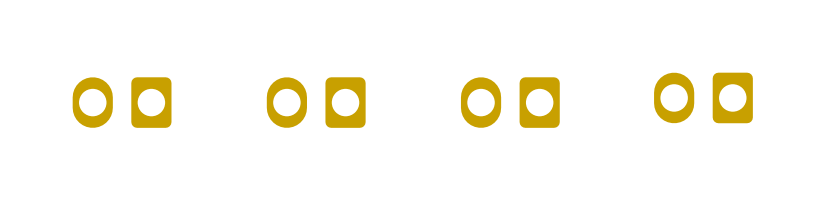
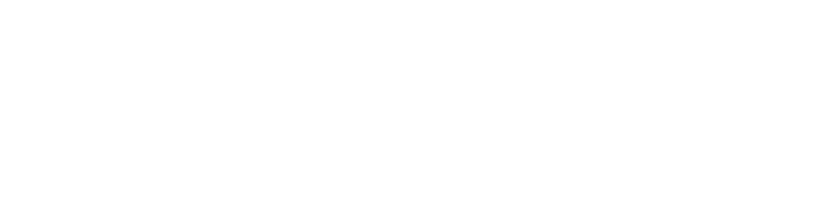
part: (703, 97) -> none
part: (122, 102) -> none
part: (316, 102) -> none
part: (510, 102) -> none

